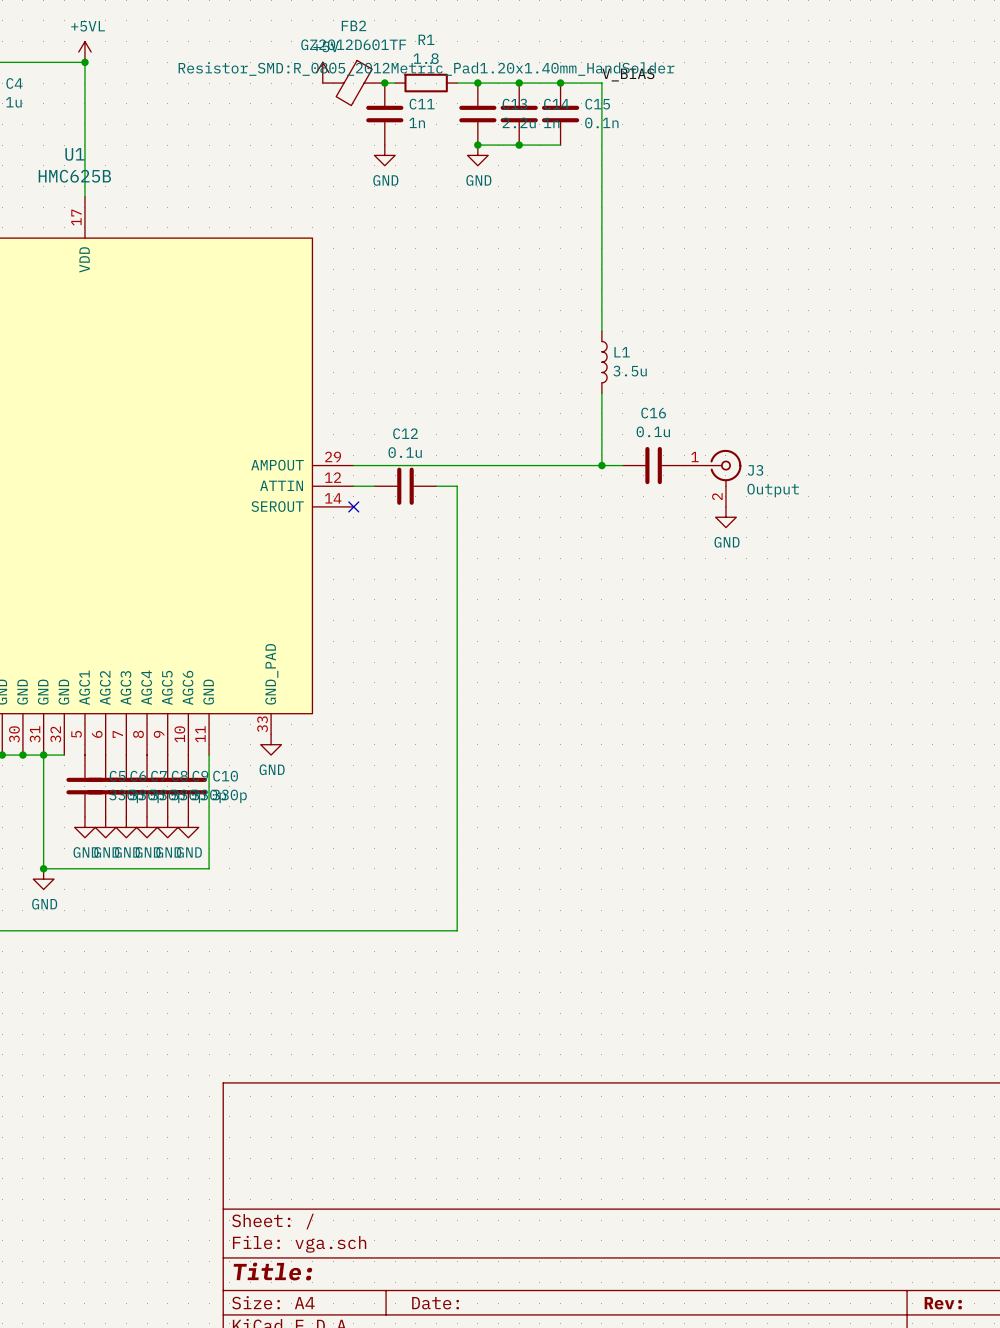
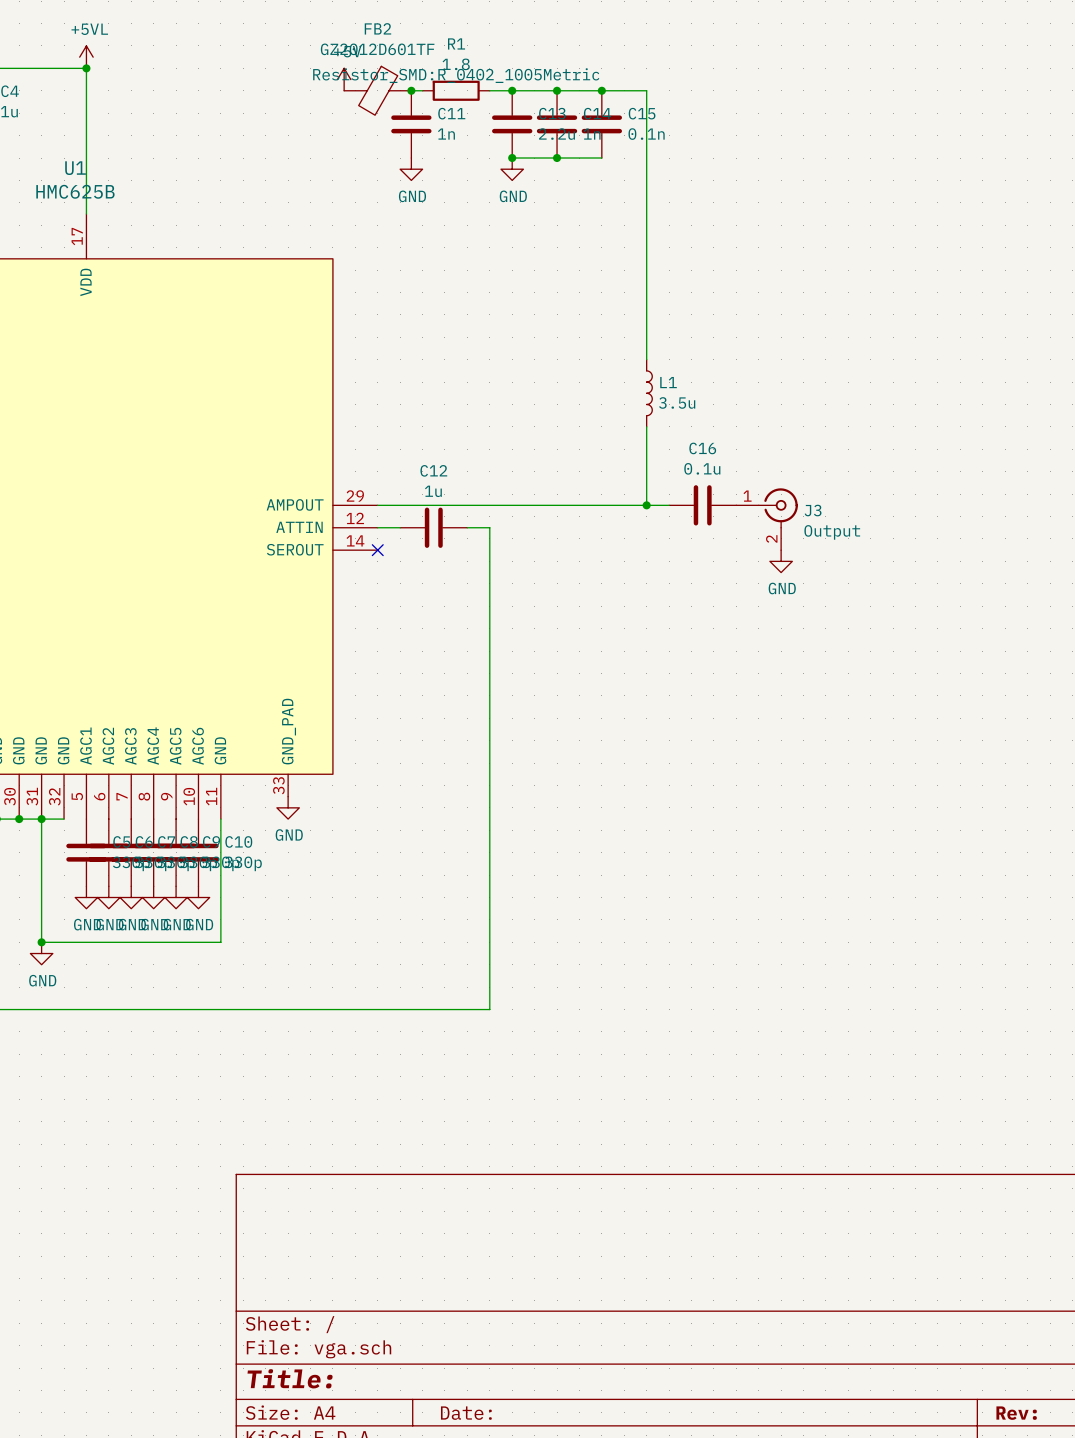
R1 text: Resistor_SMD:R_0805_2012Metric_Pad1.20x1.40mm_HandSolder (426, 69) -> Resistor_SMD:R_0402_1005Metric (456, 75)
label: V_BIAS (628, 74) -> none
C12 value: 0.1u (405, 452) -> 1u (433, 491)

